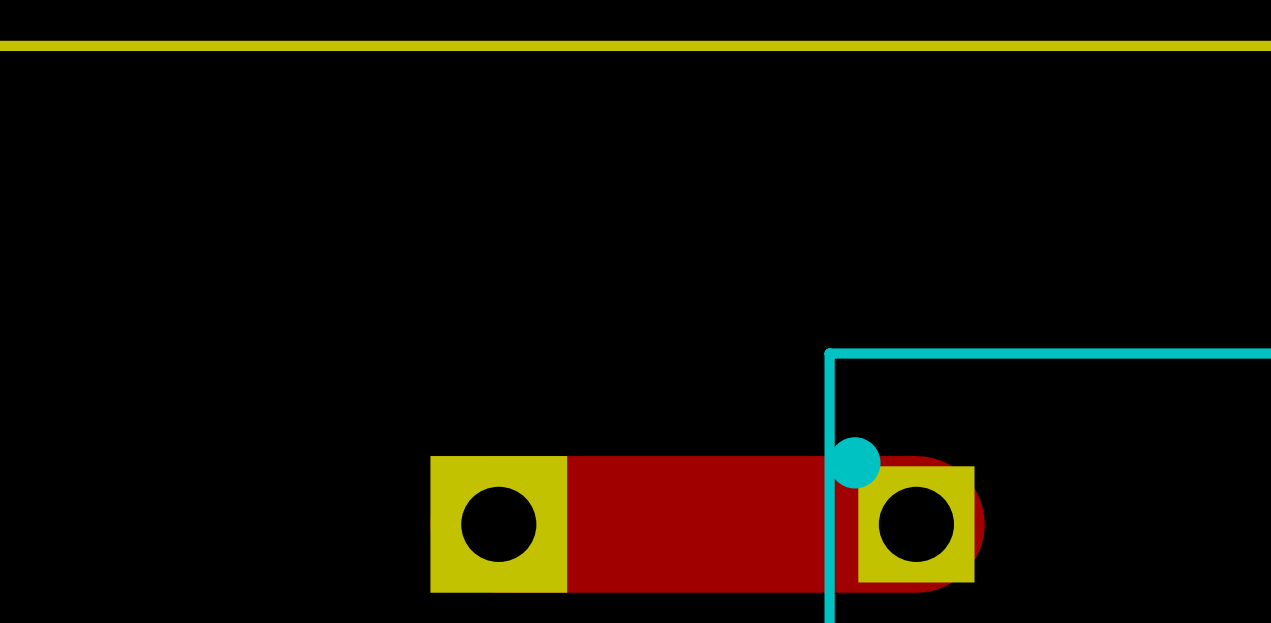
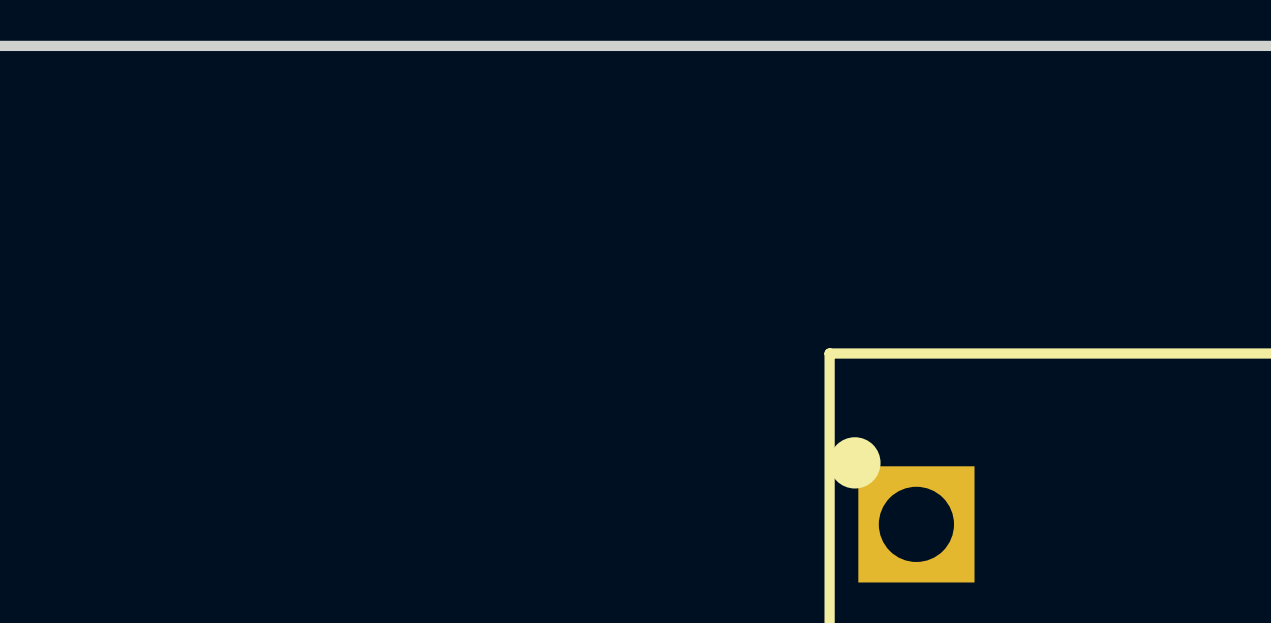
top track: (498, 524) (916, 524) -> none
part: (498, 524) -> none

